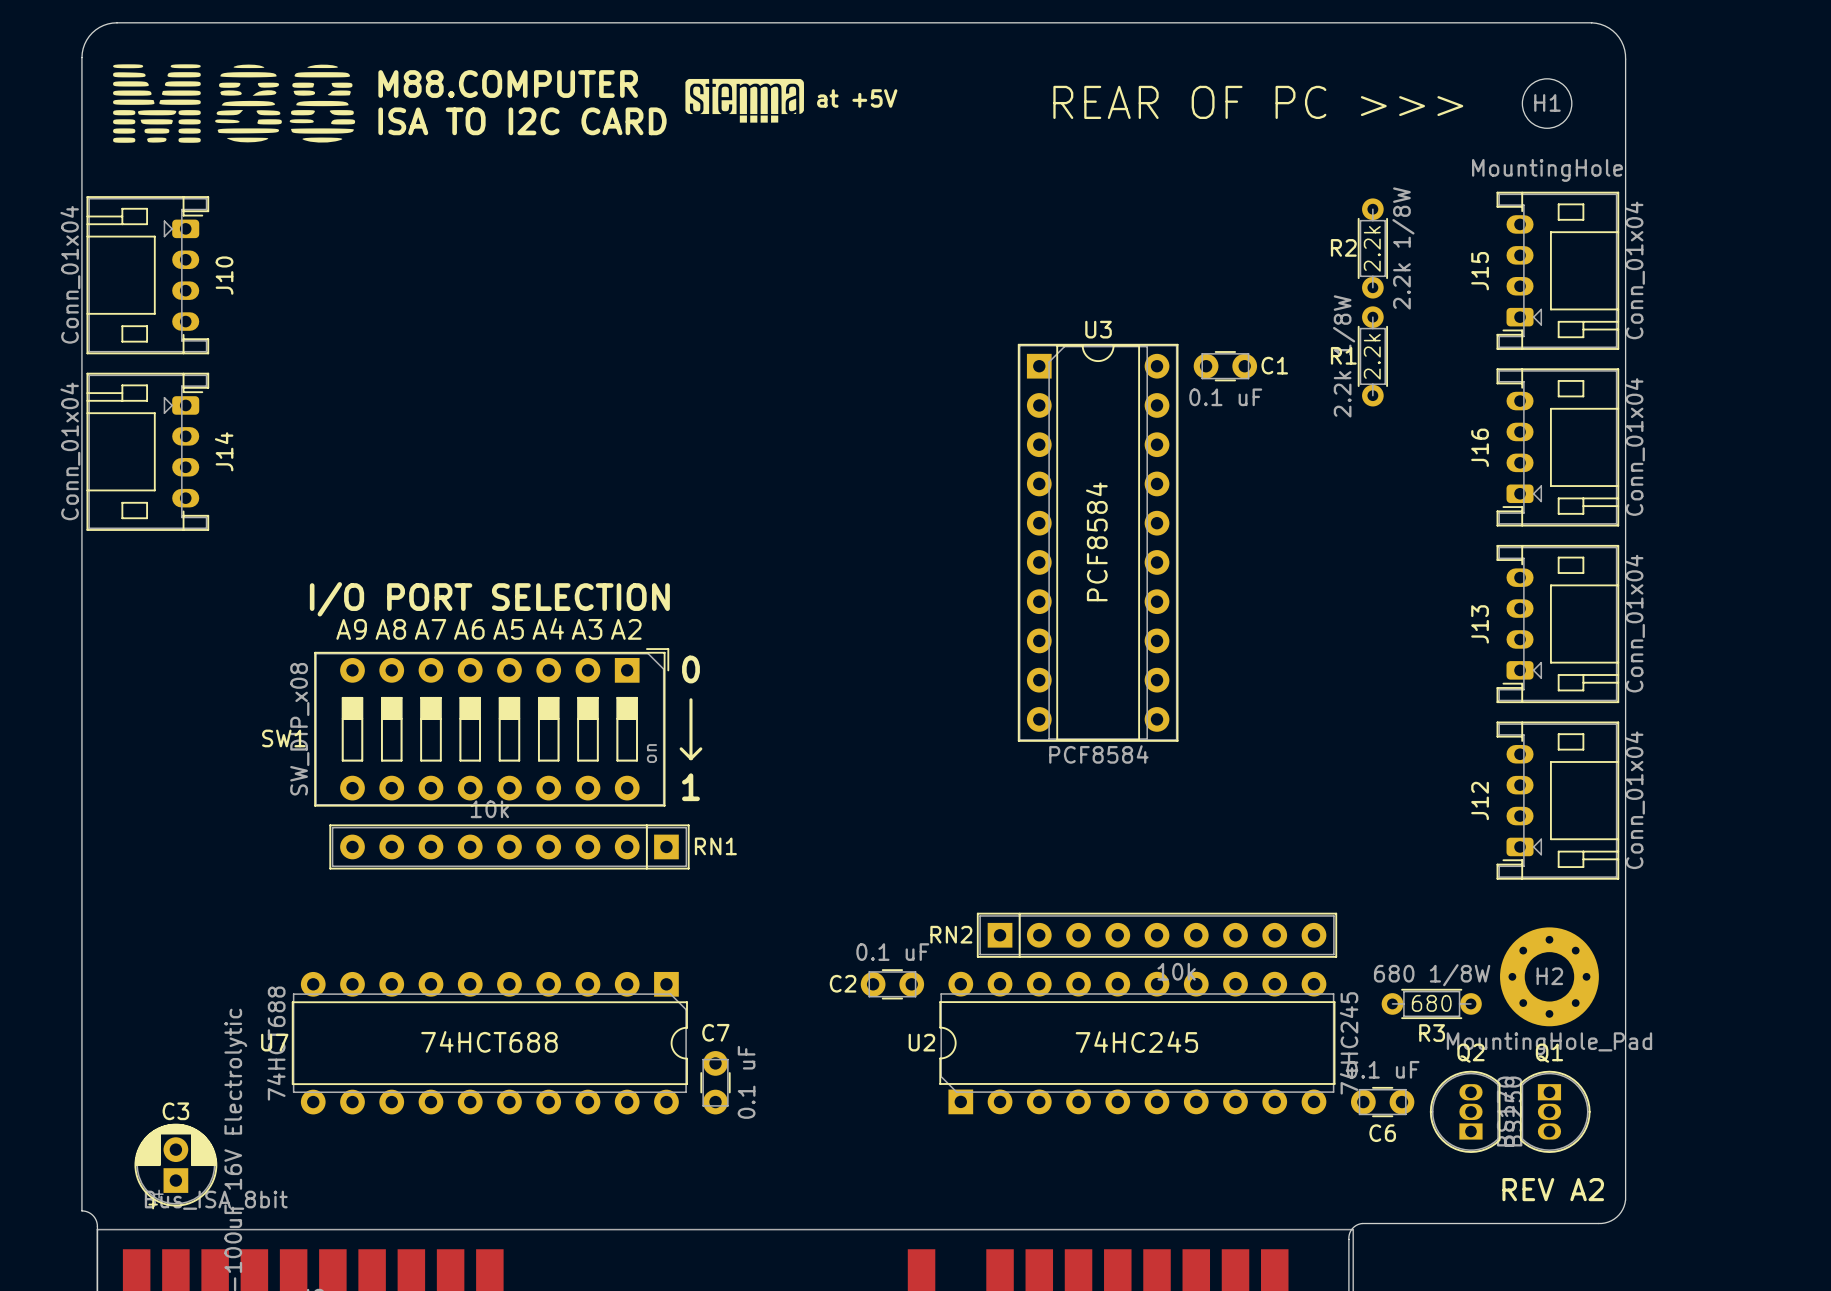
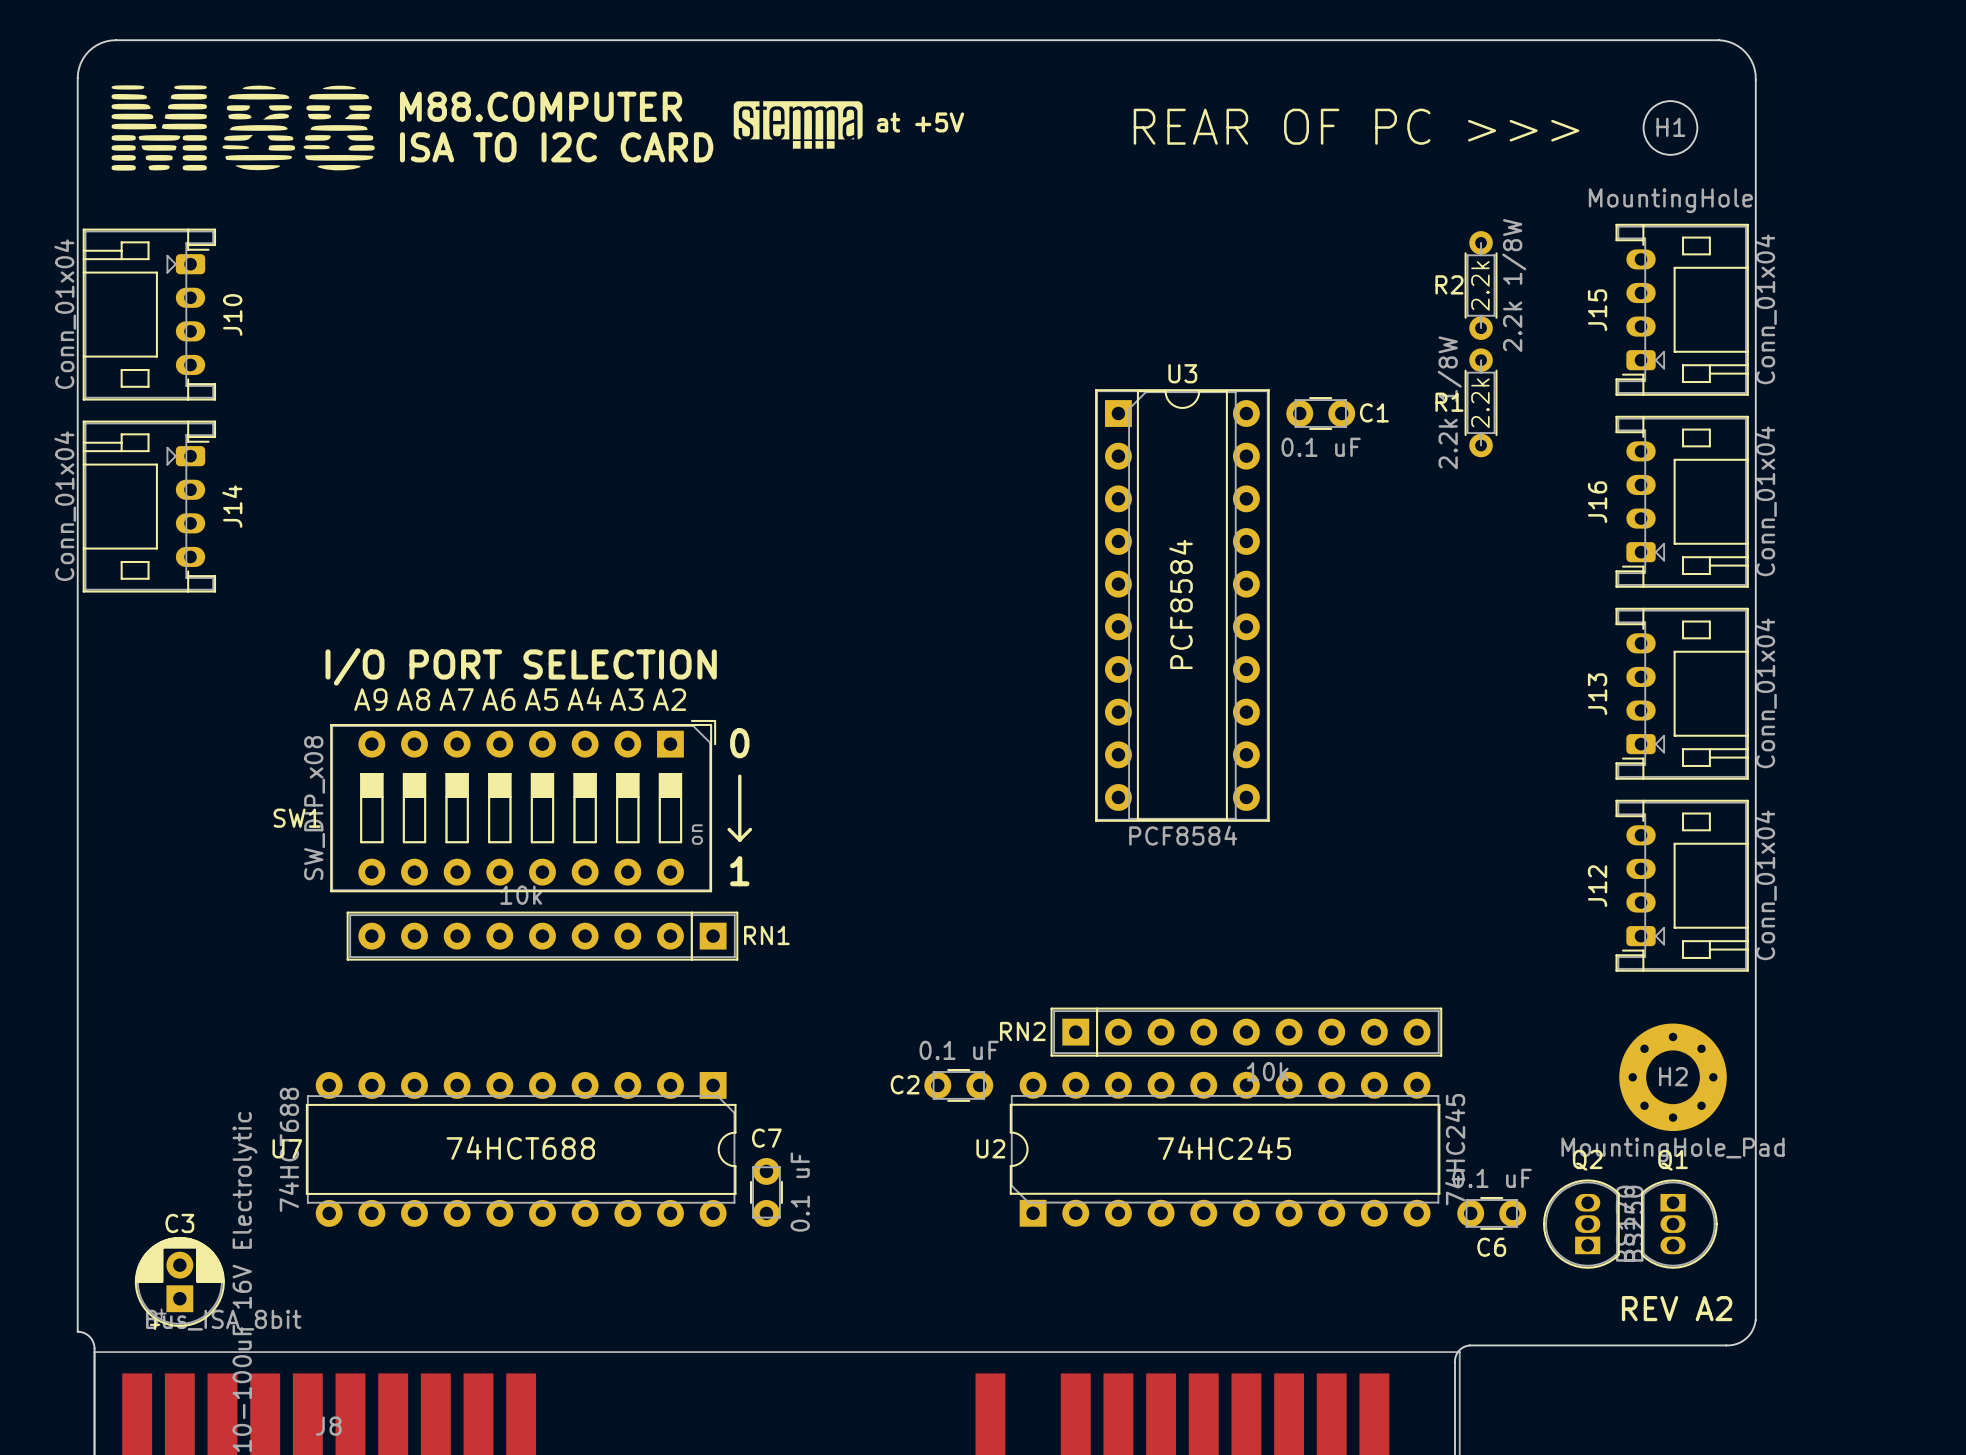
R3: 680 1/8W (1431, 1003) -> none
text: 680 (1431, 1003) -> none

